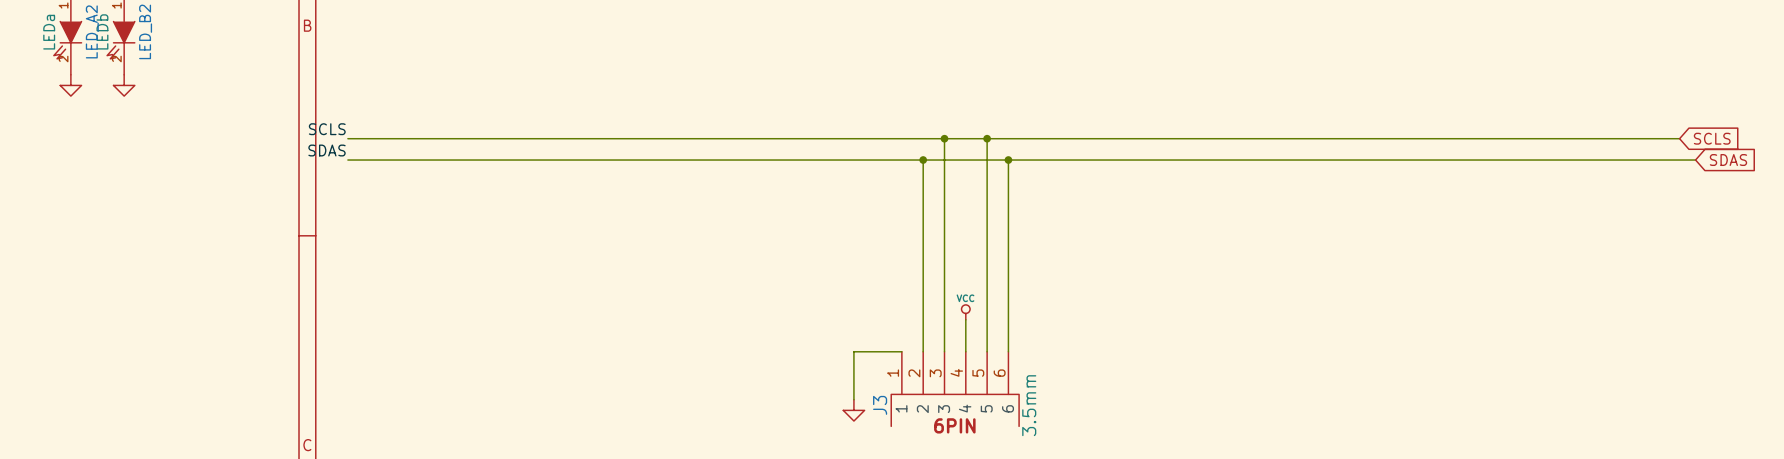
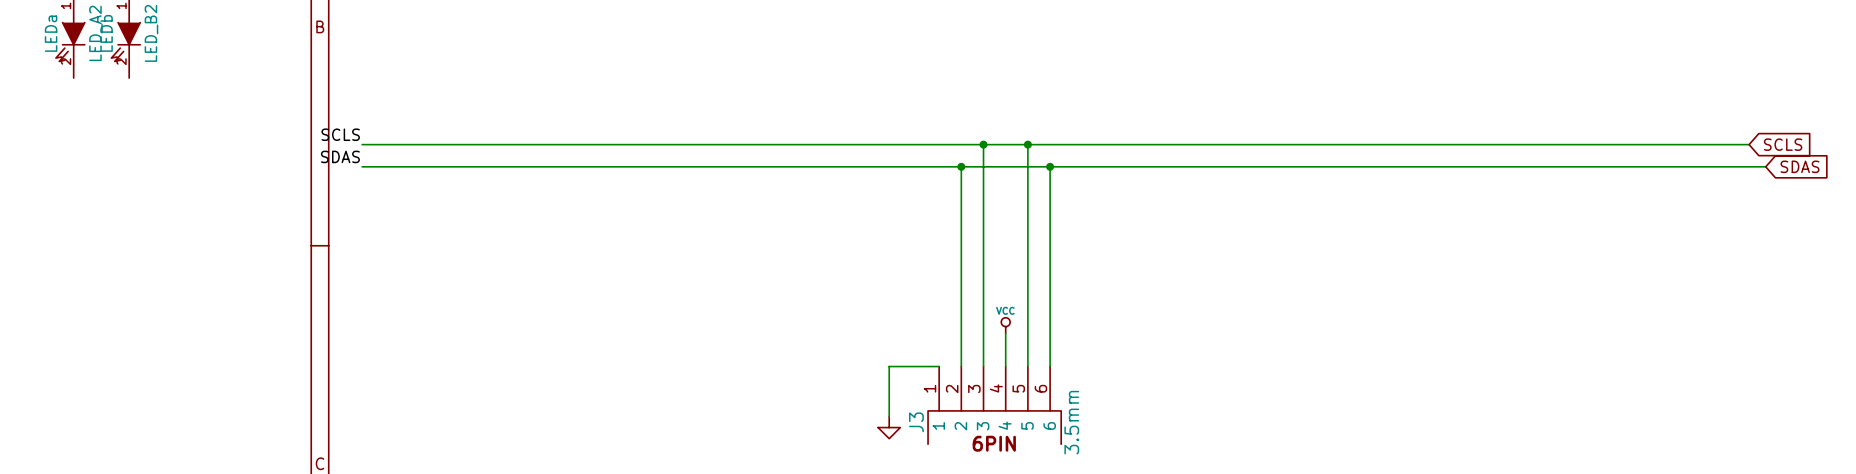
power symbol: (70, 85) -> none
power symbol: (124, 85) -> none

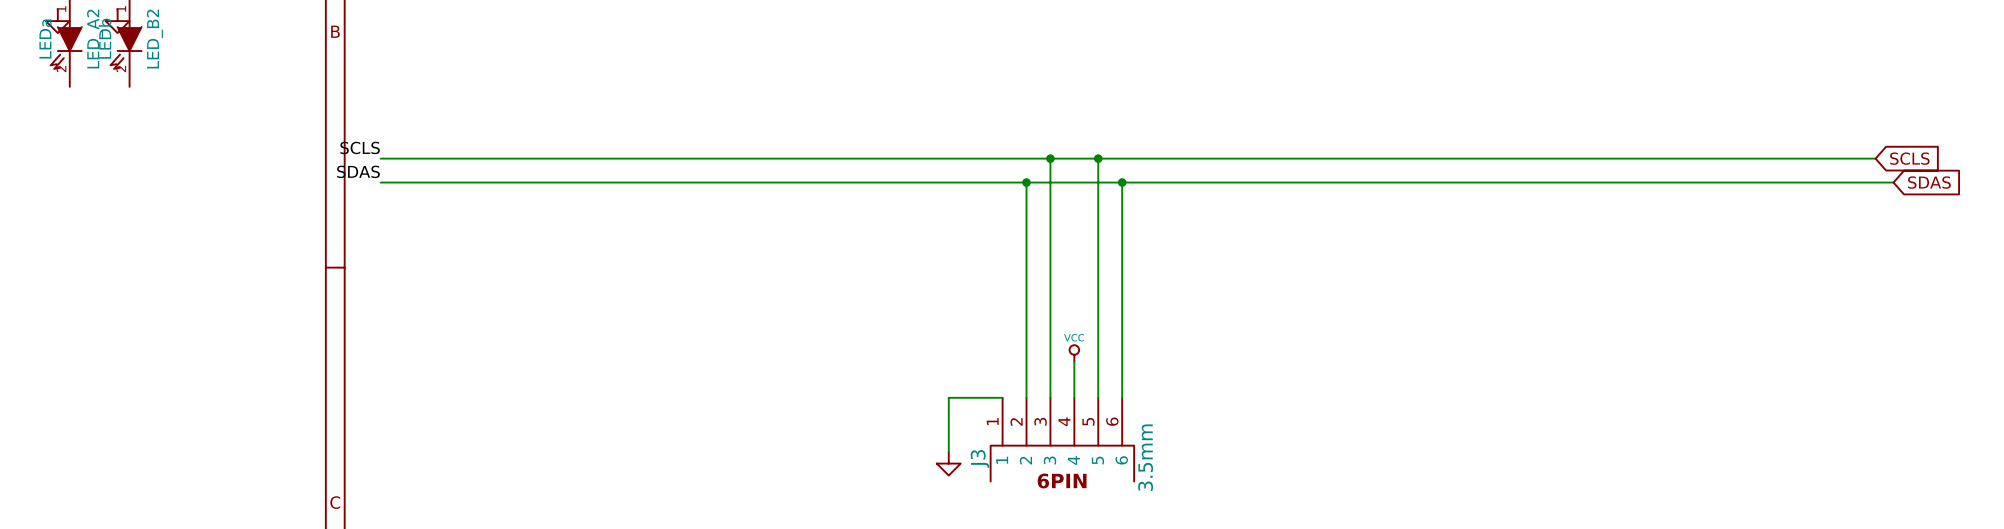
power symbol: none -> (57, 21)
power symbol: none -> (117, 21)

